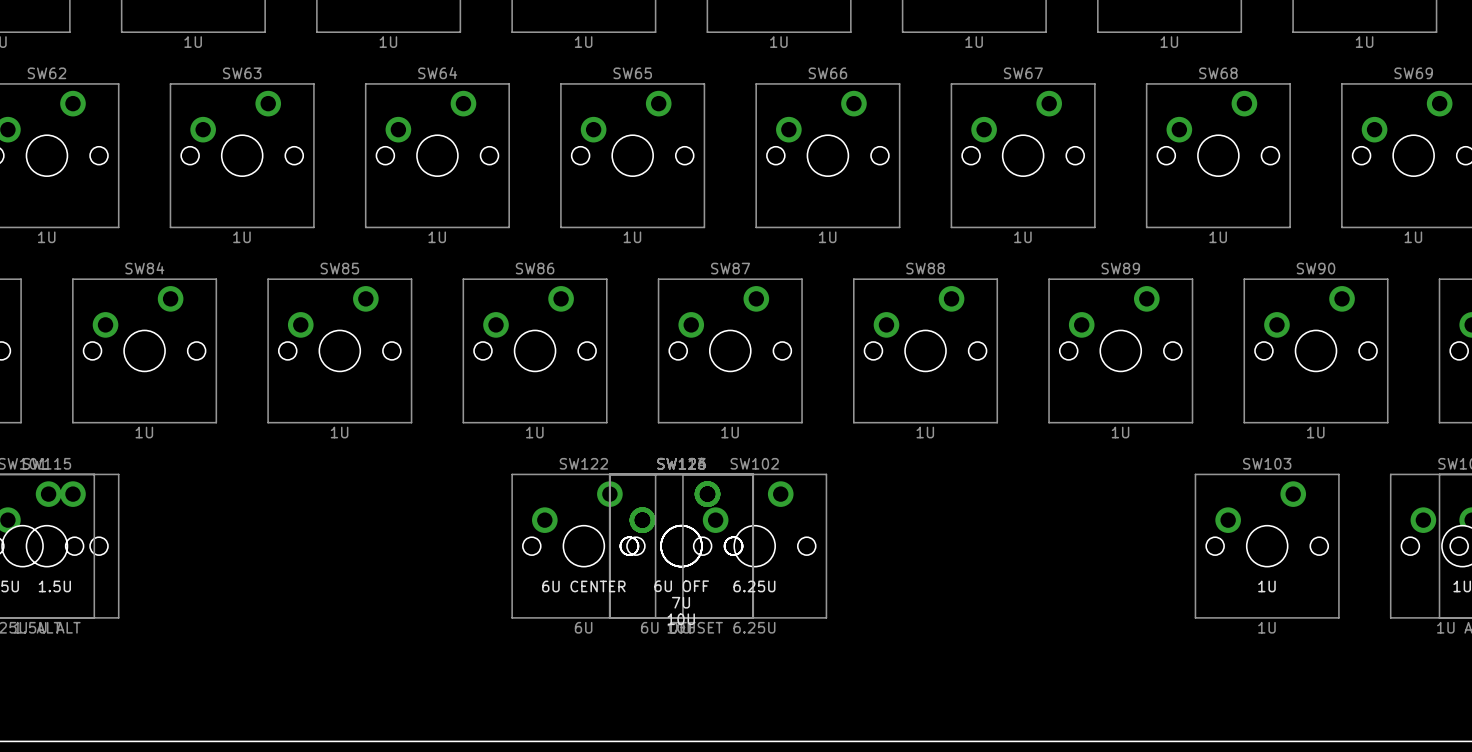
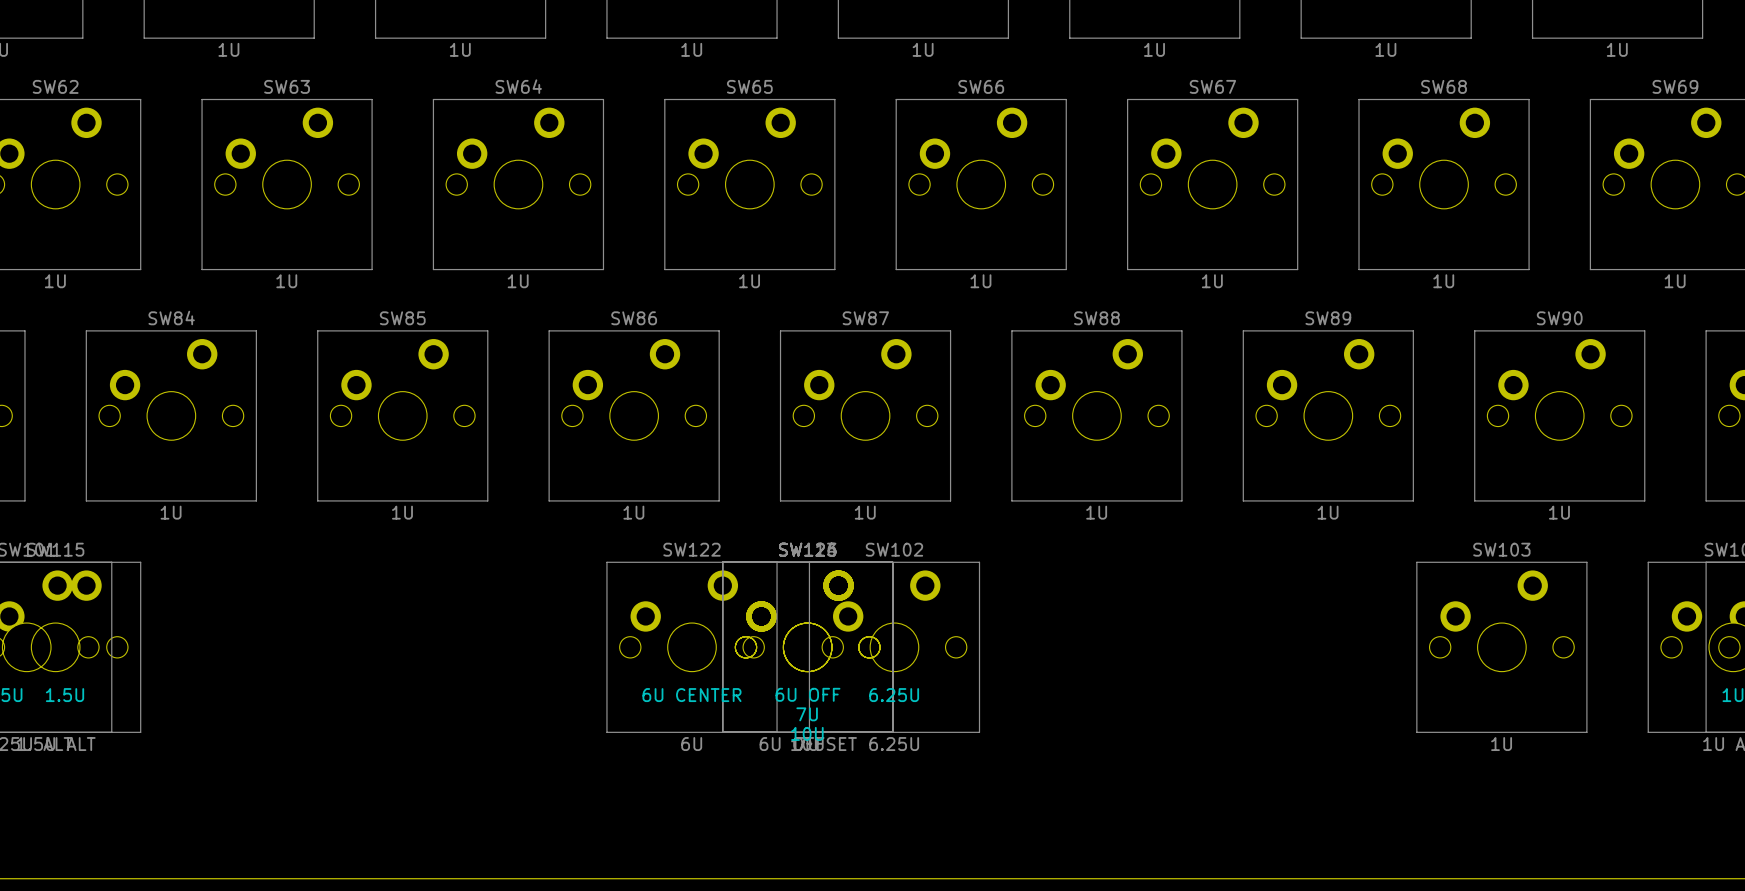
text: 1U (1266, 586) -> none

